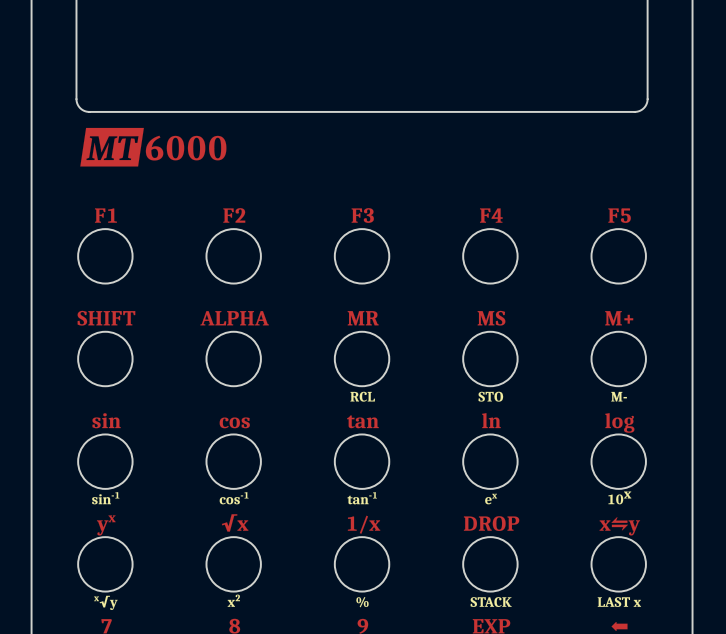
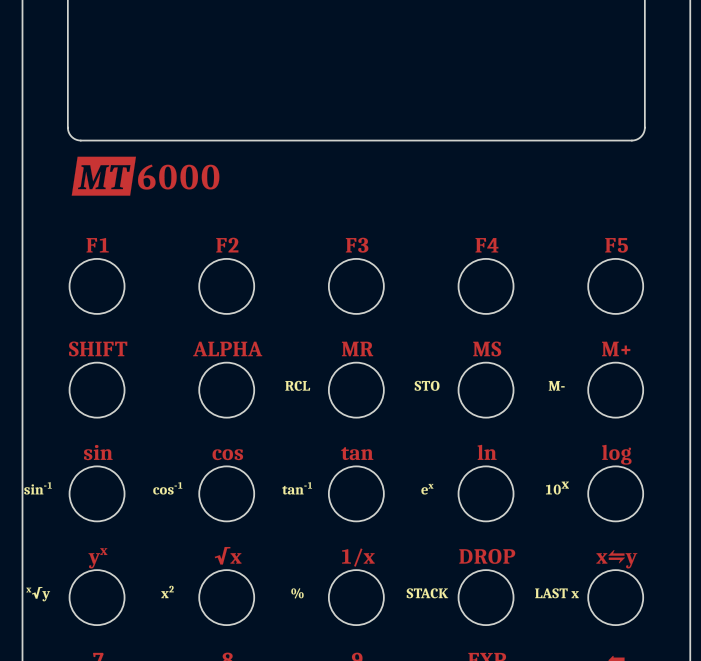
drawing position: (354, 396) -> (289, 385)
drawing position: (363, 396) -> (298, 385)
drawing position: (371, 396) -> (306, 385)
drawing position: (481, 396) -> (417, 385)
drawing position: (489, 396) -> (425, 385)
drawing position: (498, 396) -> (435, 385)
drawing position: (616, 396) -> (554, 385)
drawing position: (625, 397) -> (562, 386)
drawing: none -> [561, 481, 570, 489]
drawing: none -> [44, 482, 52, 489]
drawing: none -> [168, 482, 183, 495]
drawing: none -> [304, 482, 313, 489]
drawing: none -> [24, 487, 30, 495]
drawing: [623, 491, 632, 499] -> none
drawing: [111, 492, 120, 499] -> none
drawing: [234, 492, 249, 505] -> none
drawing: [369, 492, 377, 499] -> none
drawing position: (100, 495) -> (32, 485)
drawing position: (494, 496) -> (430, 486)
drawing: [92, 497, 98, 505] -> none
drawing position: (611, 499) -> (548, 489)
drawing position: (619, 499) -> (557, 489)
drawing position: (100, 500) -> (32, 490)
drawing position: (107, 500) -> (39, 490)
drawing position: (222, 500) -> (156, 490)
drawing position: (229, 500) -> (163, 490)
drawing position: (350, 500) -> (284, 490)
drawing position: (356, 500) -> (291, 490)
drawing position: (364, 500) -> (299, 490)
drawing position: (488, 500) -> (424, 490)
drawing: none -> [31, 586, 43, 599]
drawing: none -> [291, 588, 304, 599]
drawing: none -> [413, 588, 431, 599]
drawing: none -> [542, 588, 579, 599]
drawing: [99, 595, 111, 608] -> none
drawing position: (237, 597) -> (171, 589)
drawing: [356, 597, 369, 608] -> none
drawing: [477, 597, 495, 607] -> none
drawing: [604, 597, 642, 607] -> none
drawing position: (96, 598) -> (28, 590)
drawing position: (362, 602) -> (297, 593)
drawing position: (473, 602) -> (409, 593)
drawing position: (498, 602) -> (434, 593)
drawing position: (504, 602) -> (440, 593)
drawing position: (508, 602) -> (445, 593)
drawing position: (601, 602) -> (538, 593)
drawing position: (618, 602) -> (555, 593)
drawing position: (231, 603) -> (164, 594)
drawing position: (113, 604) -> (46, 596)

